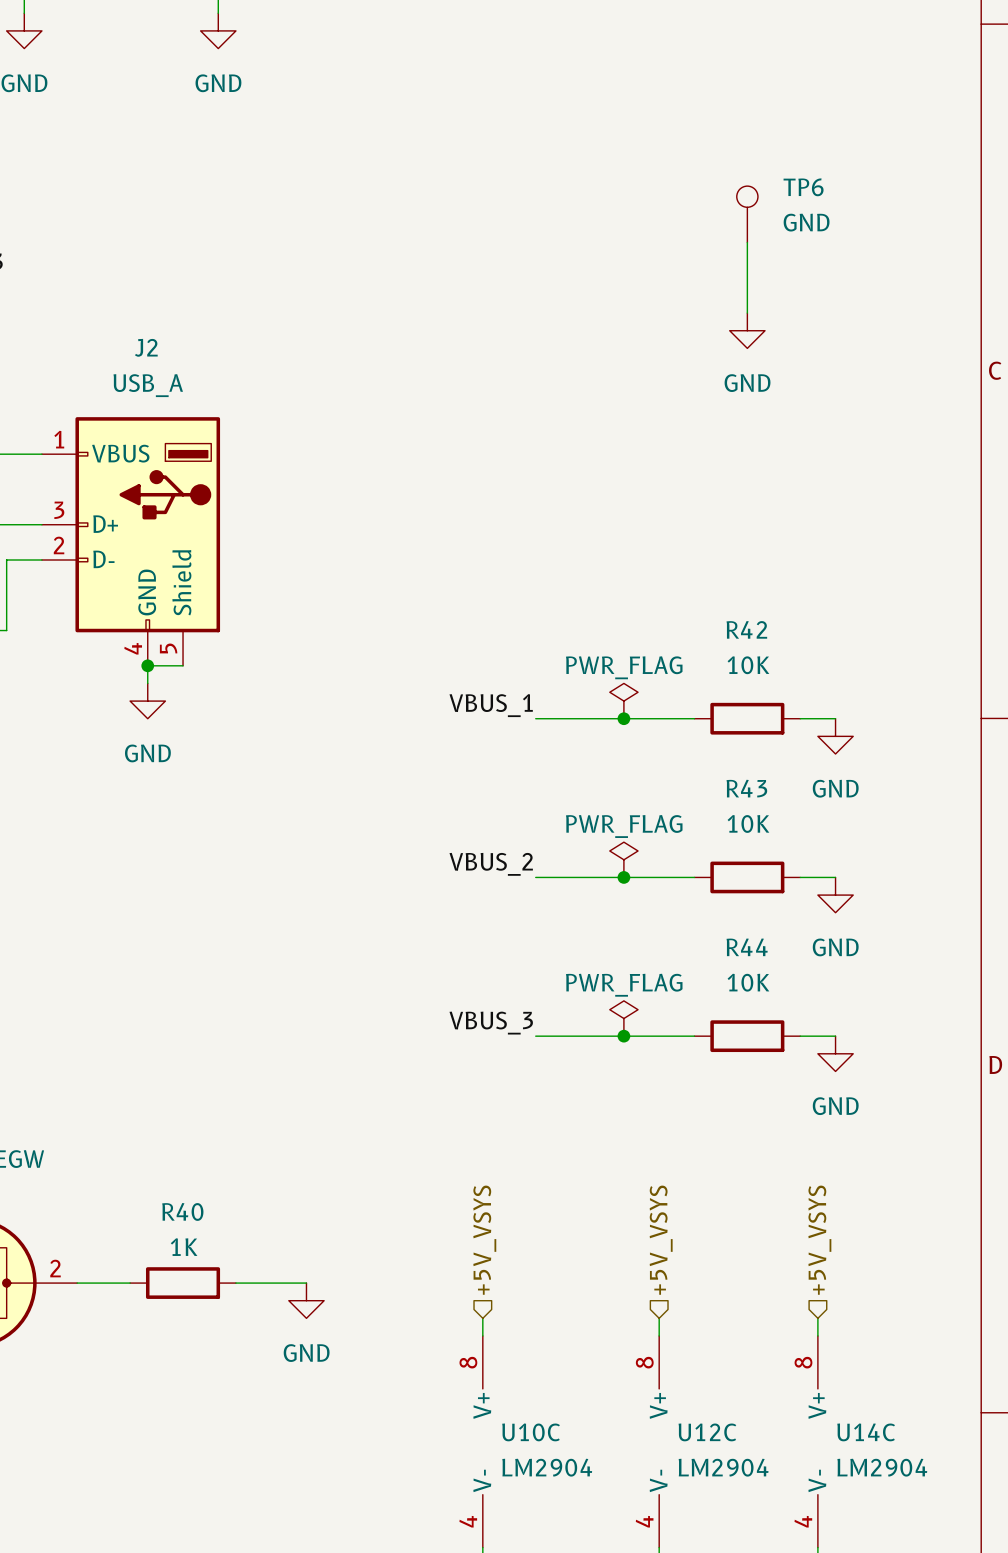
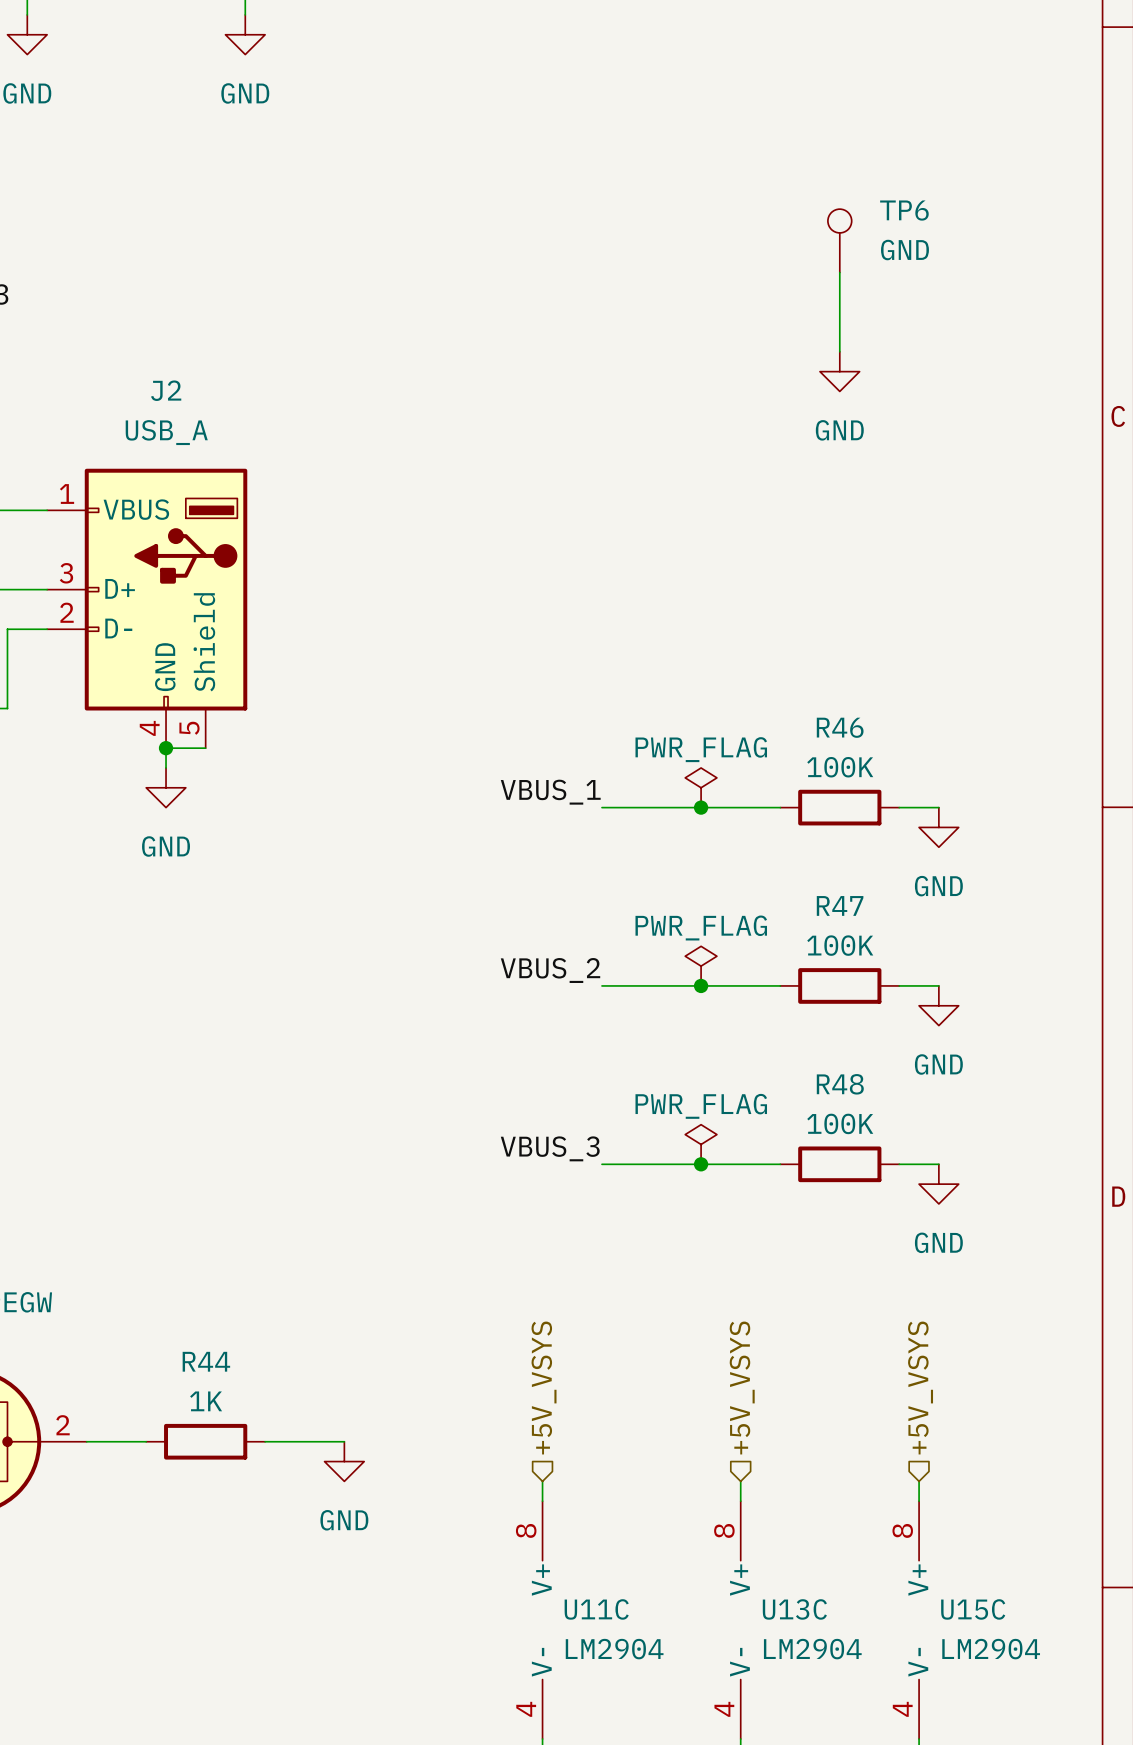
R42 name: R42 (746, 629) -> R46 (840, 727)
R42 value: 10K (748, 665) -> 100K (840, 767)
R43 name: R43 (746, 788) -> R47 (840, 905)
R43 value: 10K (748, 823) -> 100K (840, 945)
R44 name: R44 (747, 947) -> R48 (840, 1084)
R44 value: 10K (748, 982) -> 100K (840, 1123)
R40 name: R40 (182, 1211) -> R44 (206, 1361)
U10C name: U10C (531, 1432) -> U11C (596, 1609)
U12C name: U12C (707, 1432) -> U13C (794, 1609)
U14C name: U14C (866, 1432) -> U15C (973, 1609)

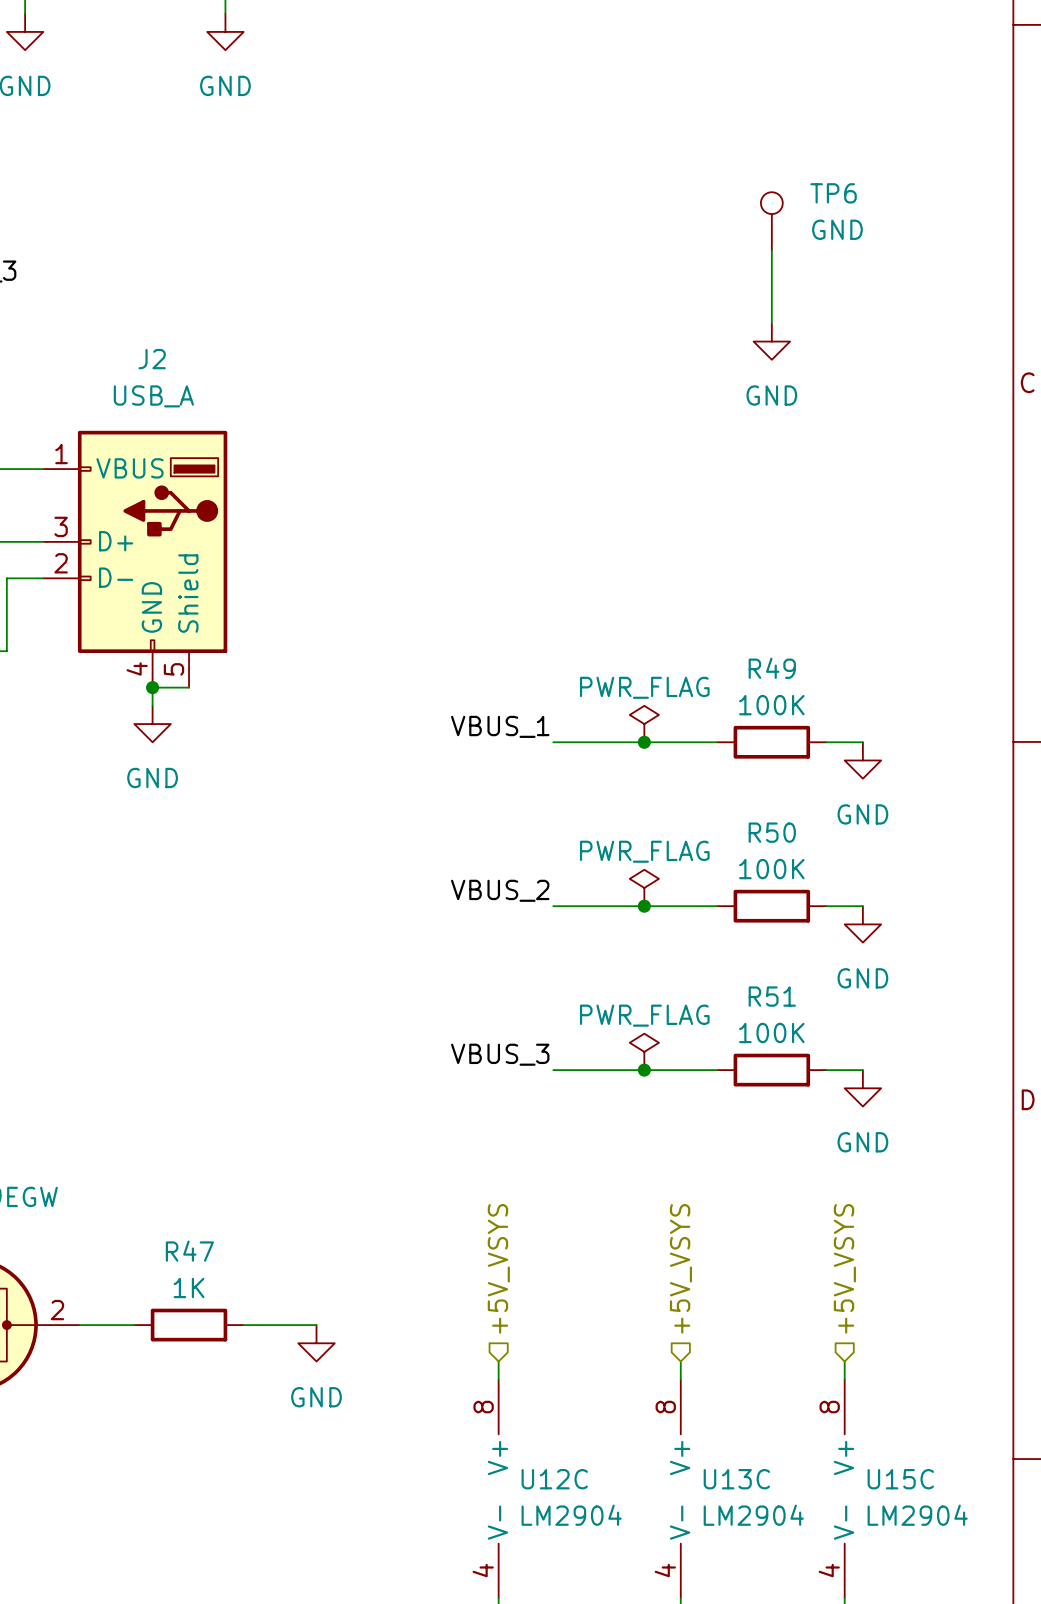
R46 name: R46 (840, 727) -> R49 (772, 668)
R47 name: R47 (840, 905) -> R50 (772, 832)
R48 name: R48 (840, 1084) -> R51 (772, 996)
R44 name: R44 (206, 1361) -> R47 (189, 1251)
U11C name: U11C (596, 1609) -> U12C (554, 1479)

